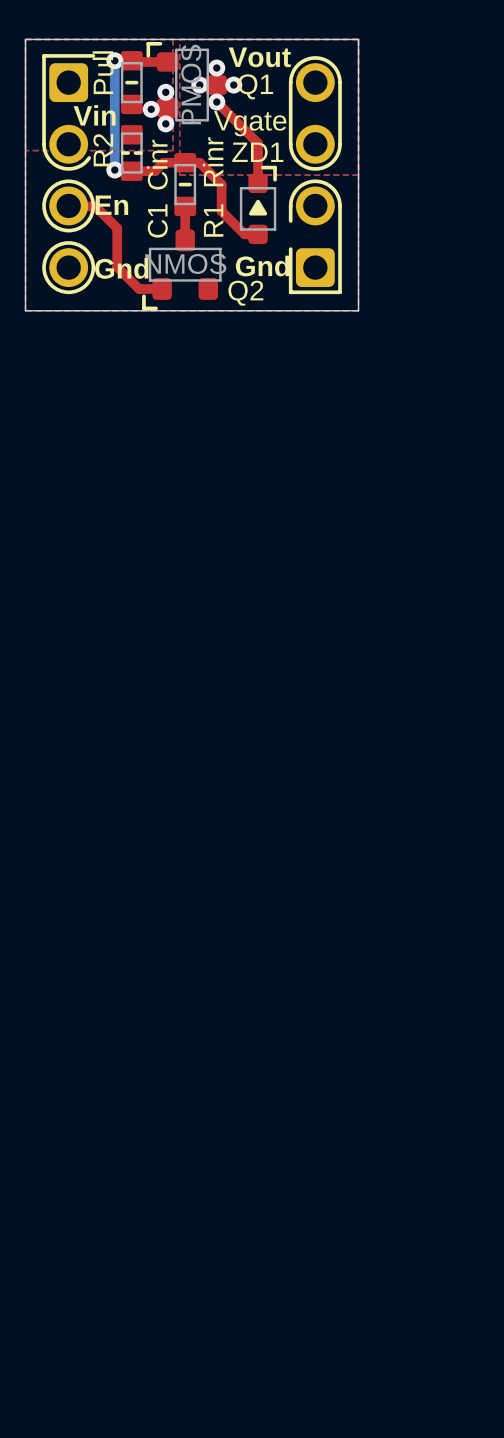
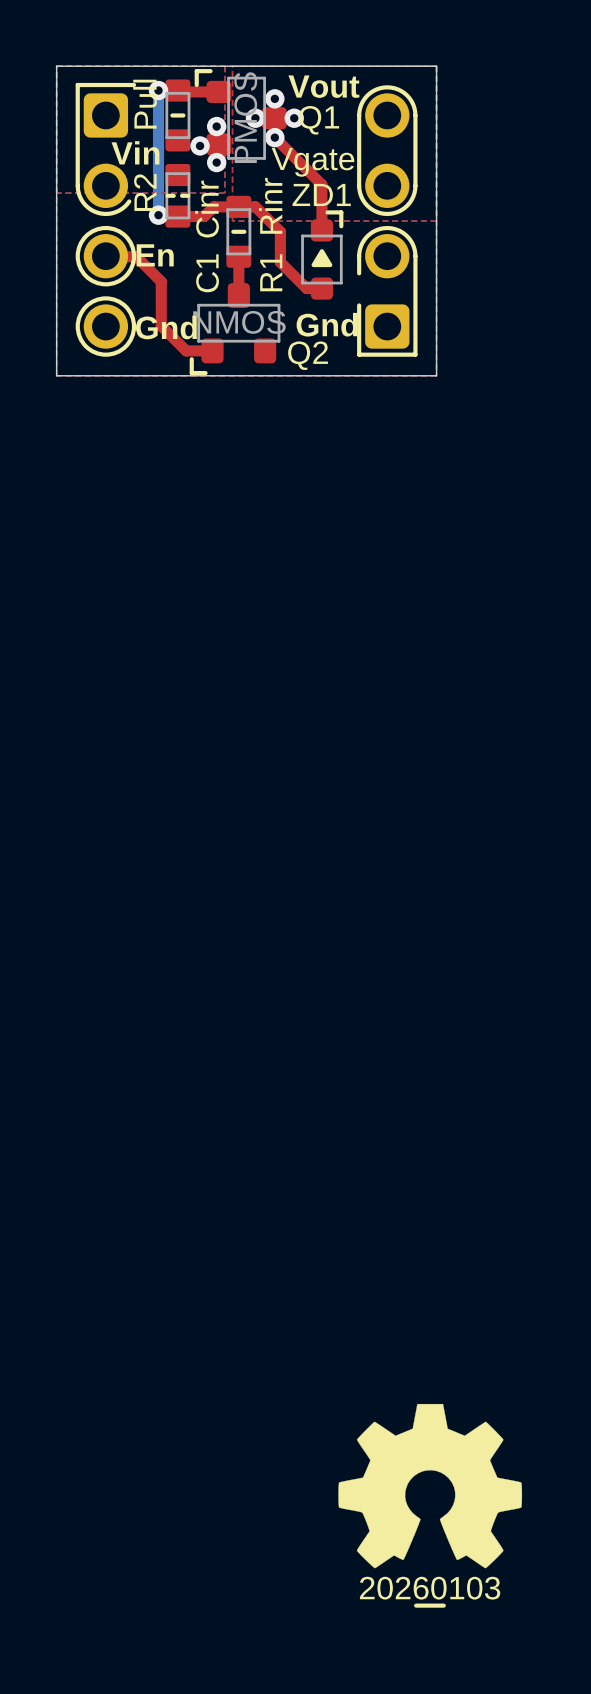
drawing: none -> [338, 1403, 523, 1608]

